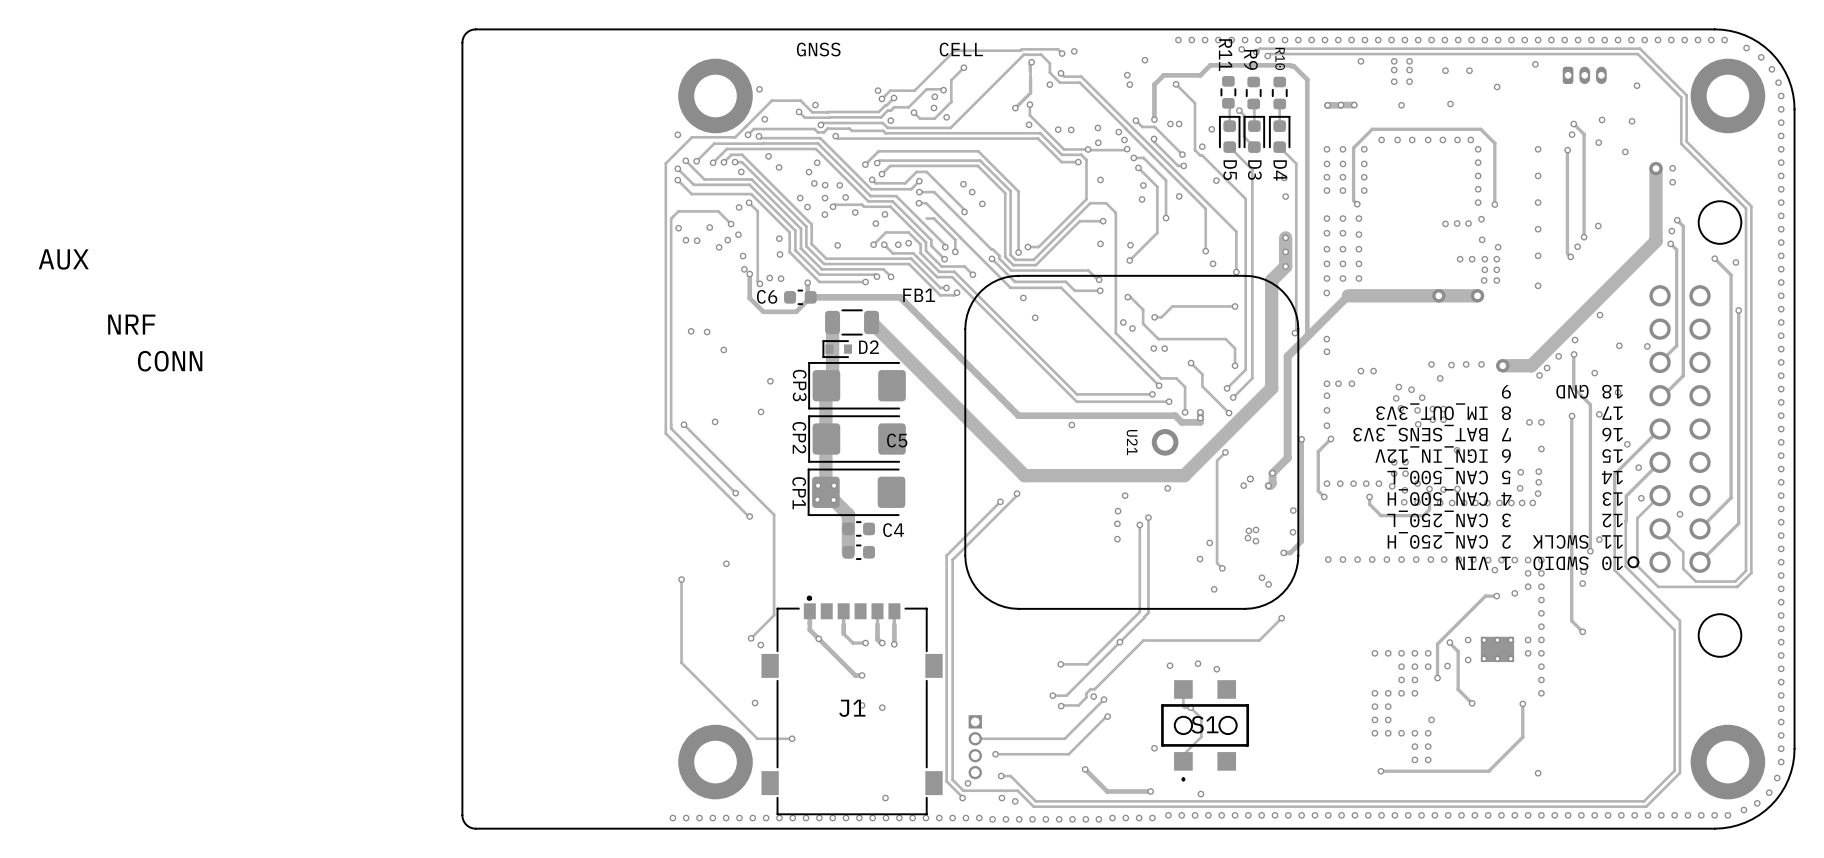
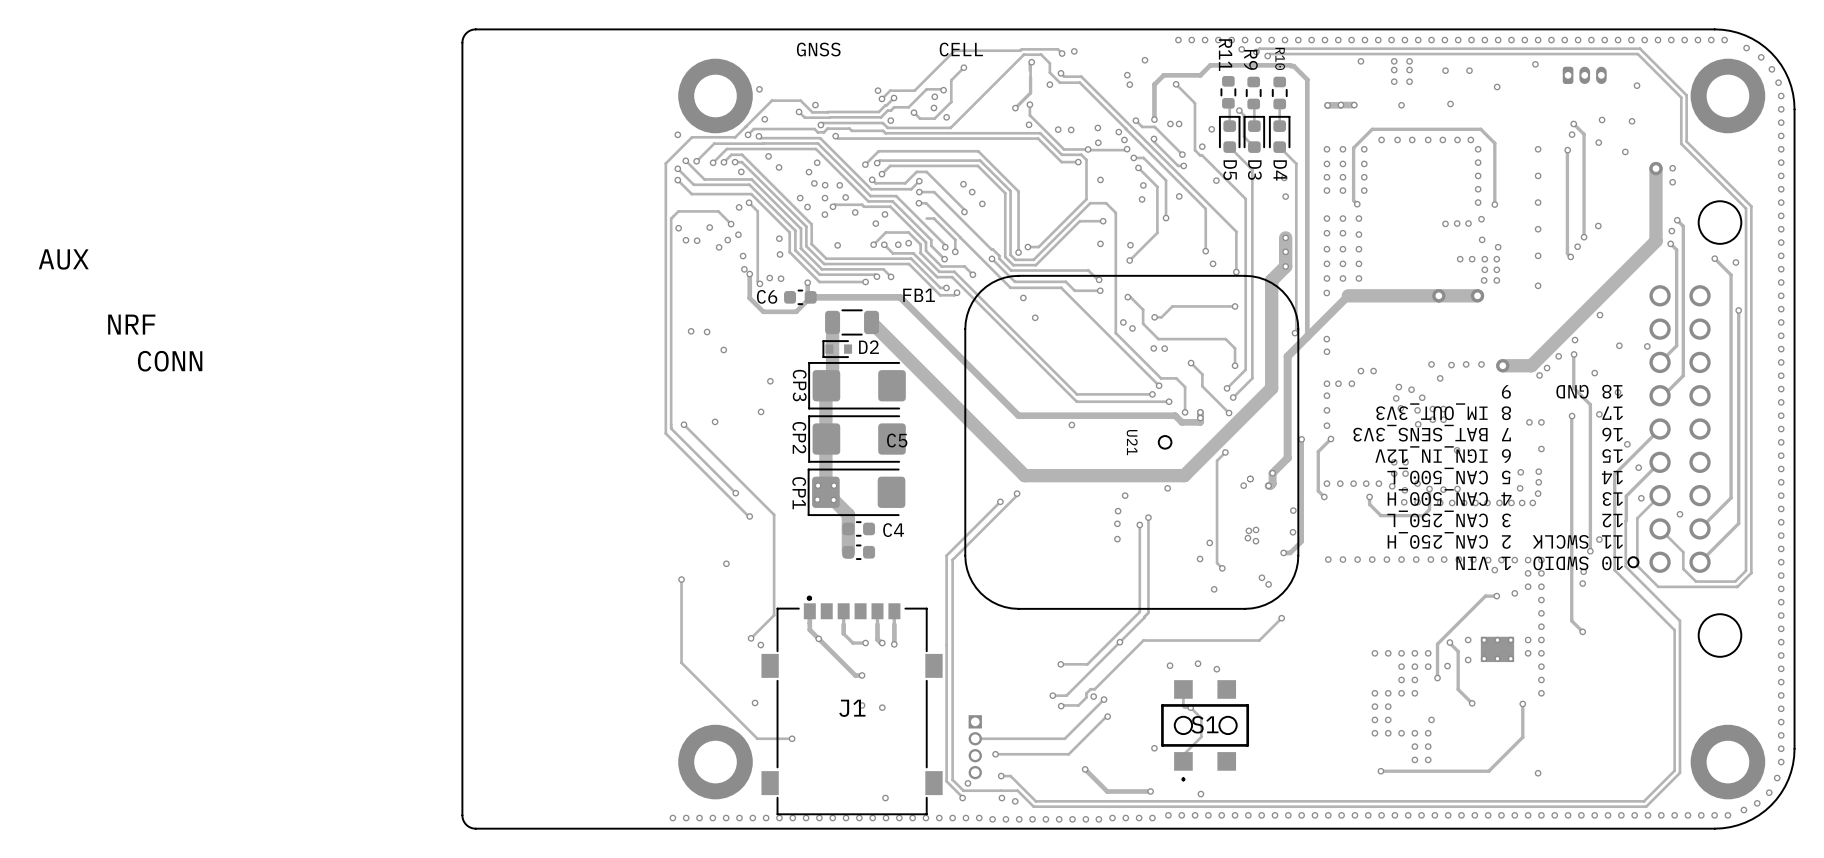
U21 footprint: [964, 274, 1300, 610] -> [964, 274, 1300, 610]

